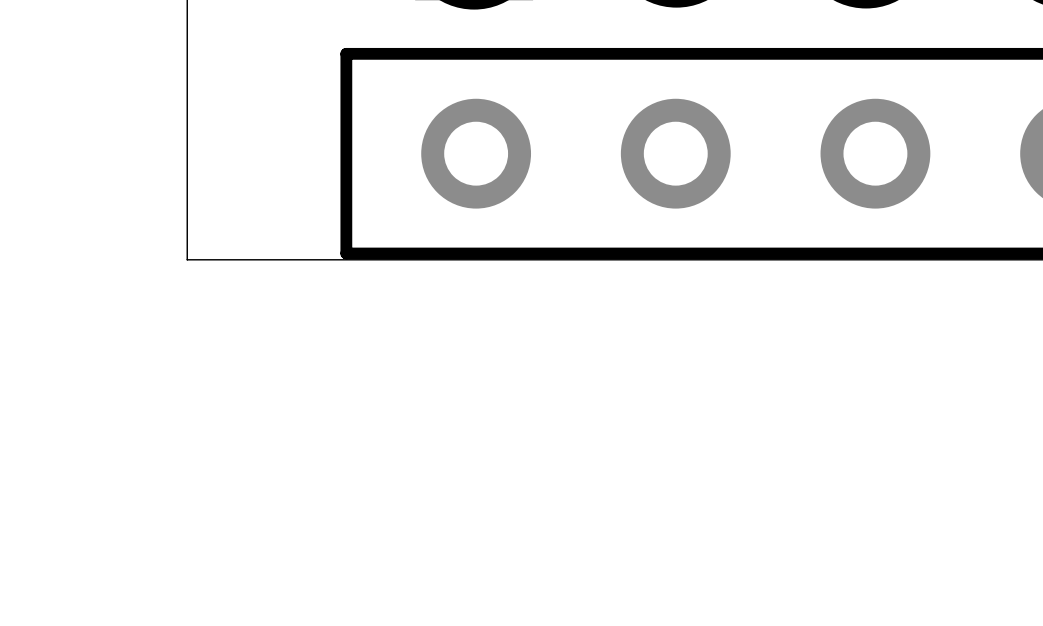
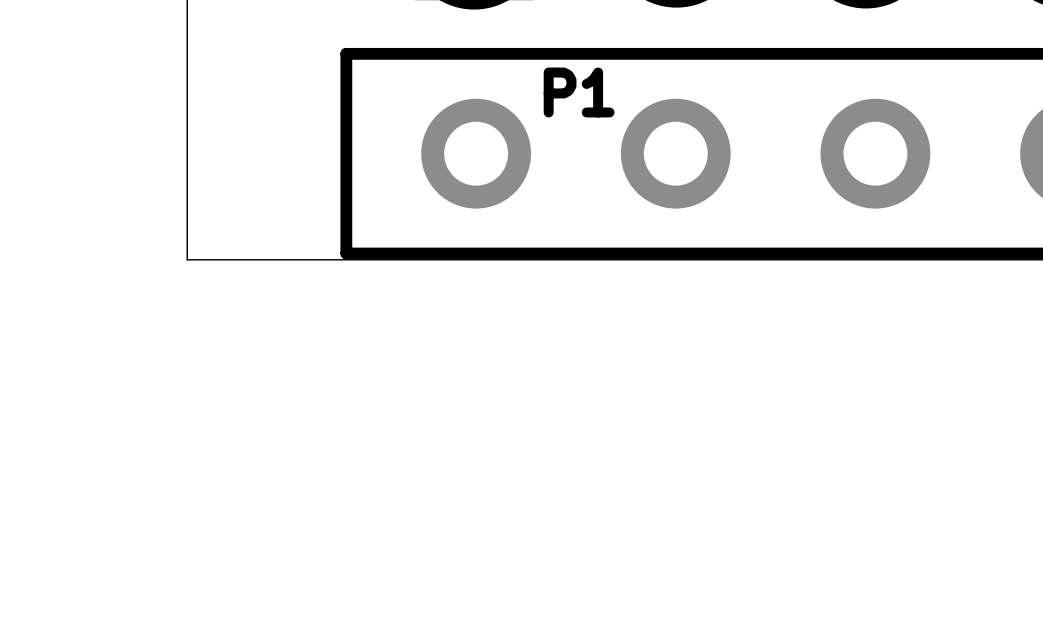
P1 name: none -> P1 (579, 92)

